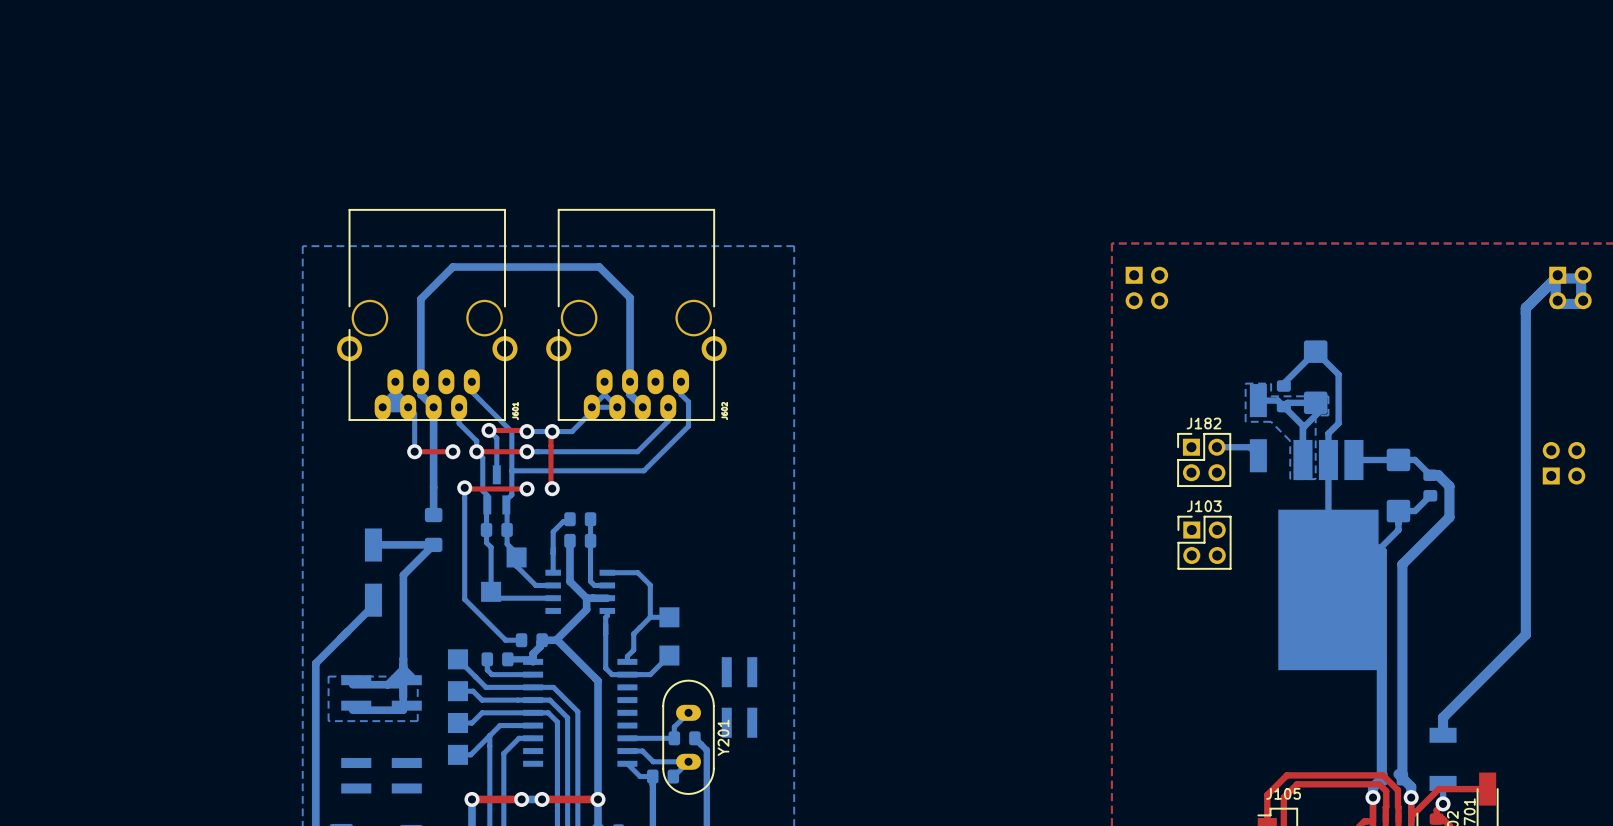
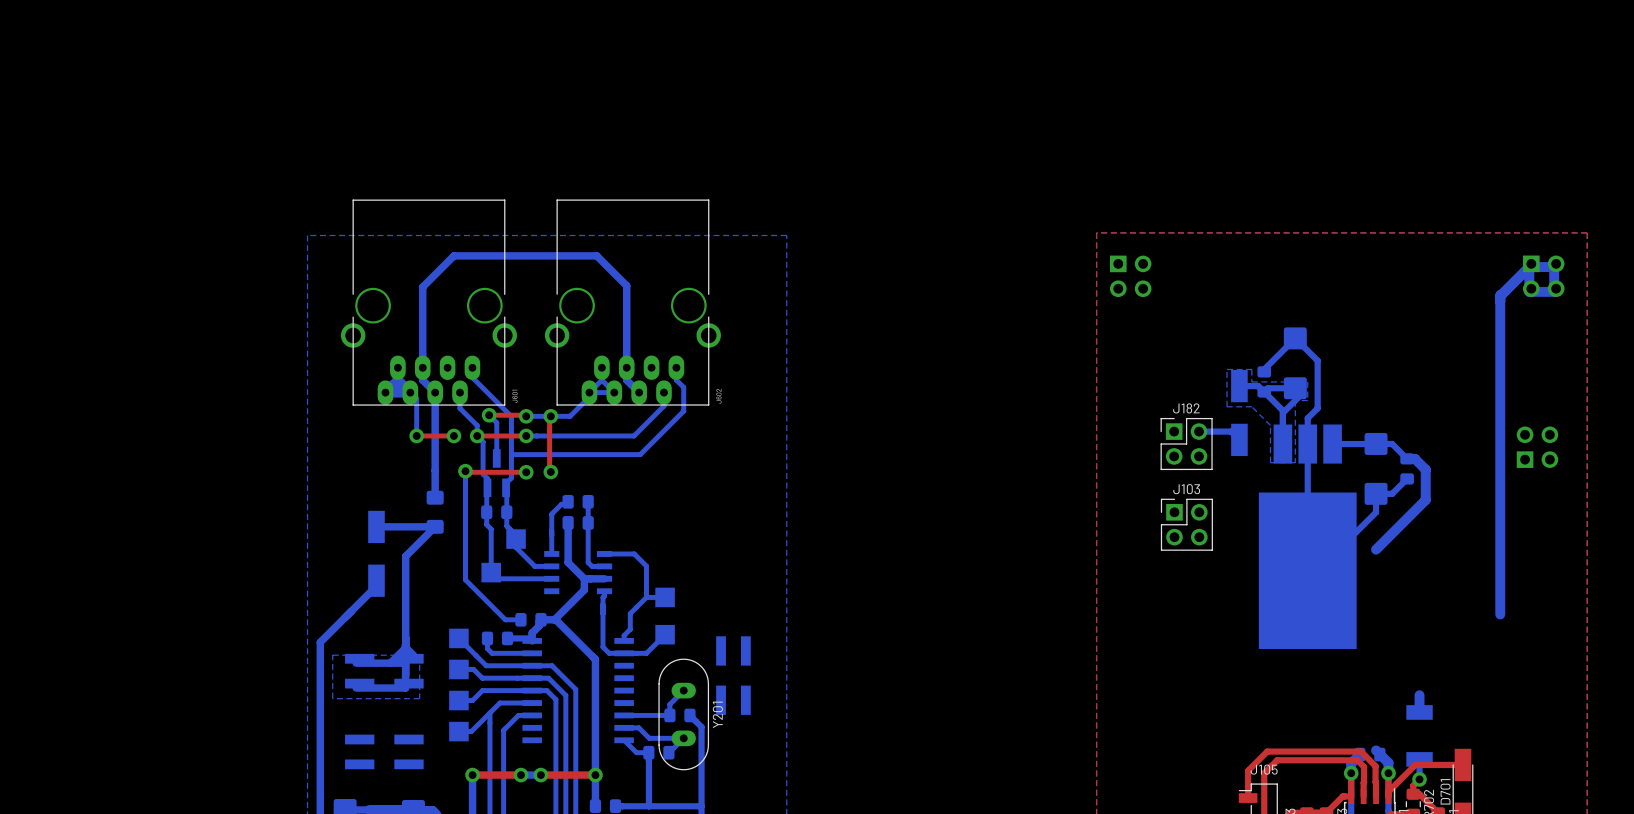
bottom track: (1379, 549) (1381, 551) (1381, 778) -> none
bottom track: (1402, 564) (1402, 778) -> (1379, 545) (1376, 549)
bottom track: (1525, 634) (1443, 717) -> none

